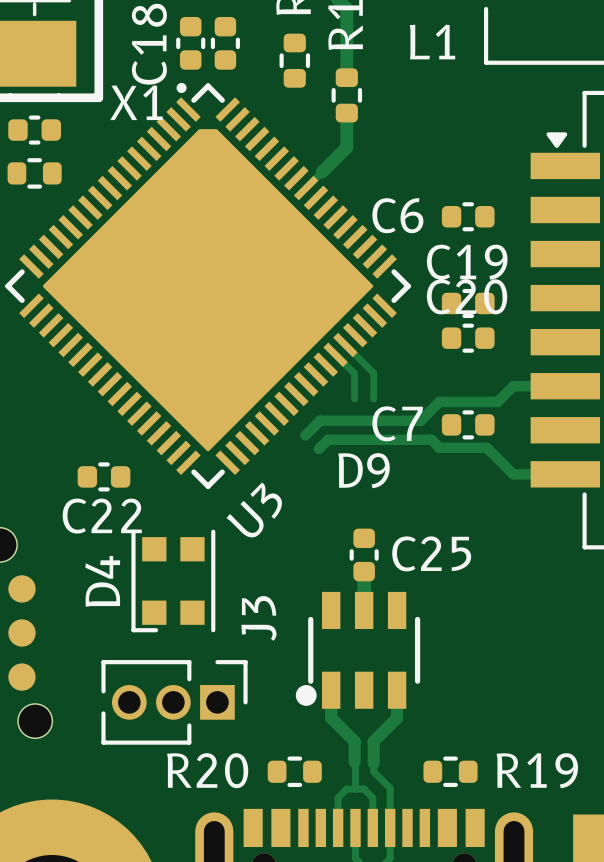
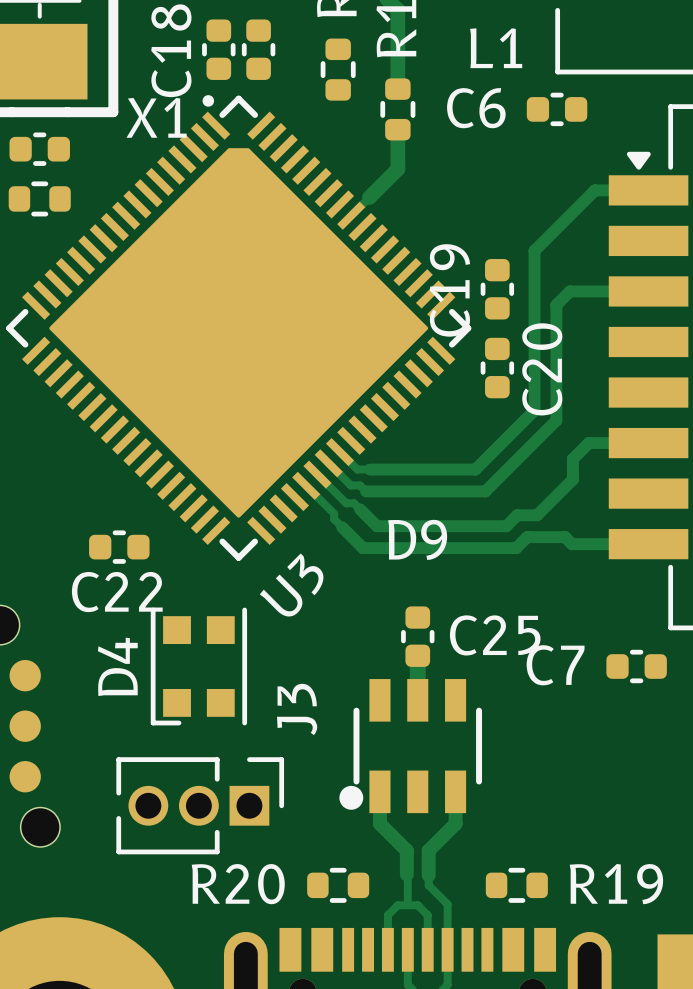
track: none -> (648, 190) (594, 190) (534, 250) (534, 410) (475, 469) (357, 469) (339, 452)
C6 position: (468, 216) -> (557, 109)
track: none -> (648, 291) (569, 291) (556, 305) (556, 420) (485, 491) (366, 491) (360, 485) (350, 485) (328, 463)
C19 rotation: 0° (468, 303) -> 90° clockwise (497, 289)
C19 position: (468, 303) -> (497, 289)
C20 rotation: 0° (468, 338) -> 90° clockwise (497, 368)
C20 position: (468, 338) -> (497, 368)
track: (345, 345) (373, 373) (373, 398) -> none
track: (335, 354) (354, 373) (354, 398) -> none
track: (499, 400) (497, 401) (439, 401) (420, 420) (320, 420) (305, 435) -> (572, 458) (572, 479) (537, 515) (517, 515) (506, 526) (376, 526) (354, 503) (346, 503) (317, 474)
C7 position: (468, 424) -> (636, 666)
track: (318, 448) (328, 439) (431, 439) (439, 447) (486, 447) (513, 474) -> (306, 485) (334, 513) (334, 519) (363, 548) (516, 548) (527, 537) (565, 537) (571, 544) (588, 544)

